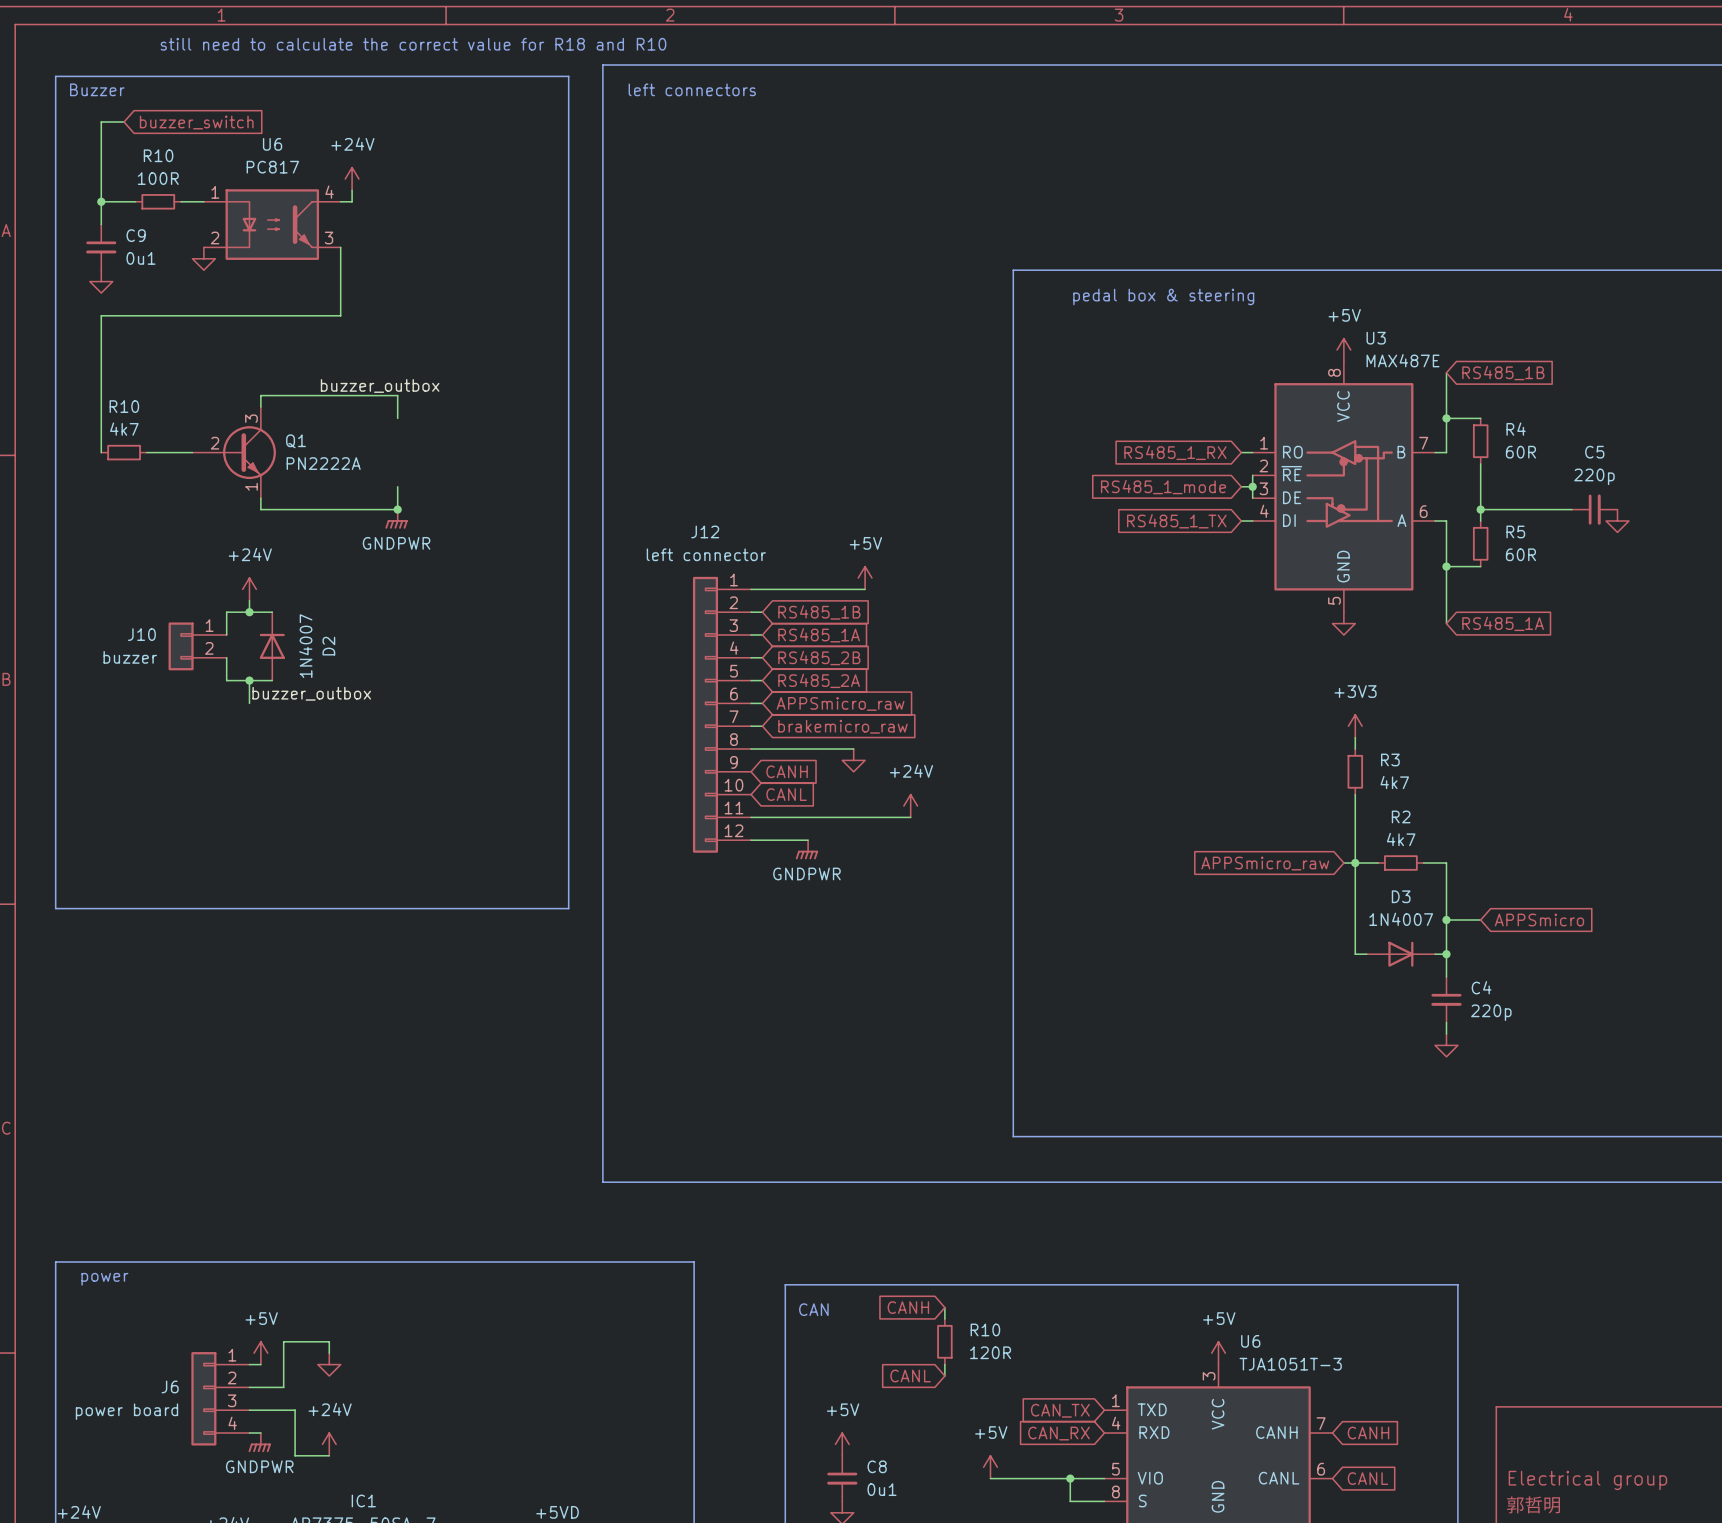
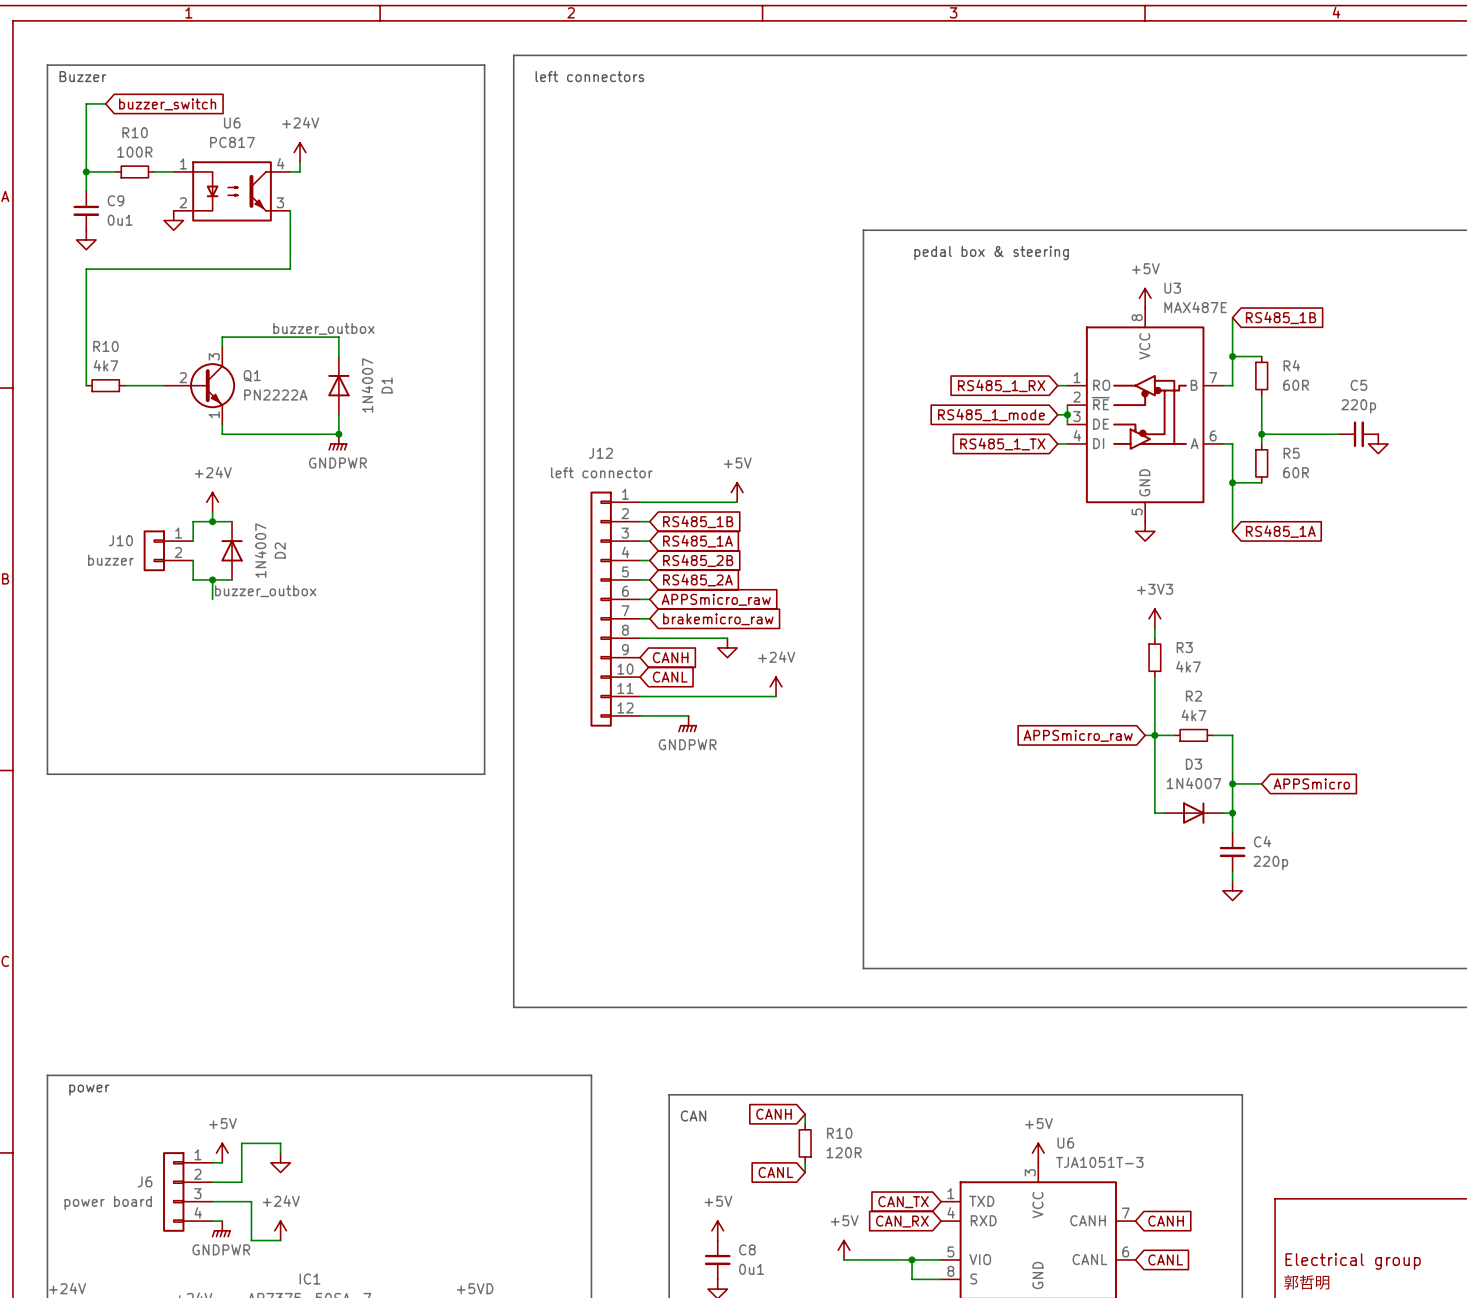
text: still need to calculate the correct value for R18 and R10 (413, 44) -> none
D1: none -> 1N4007 (338, 385)

